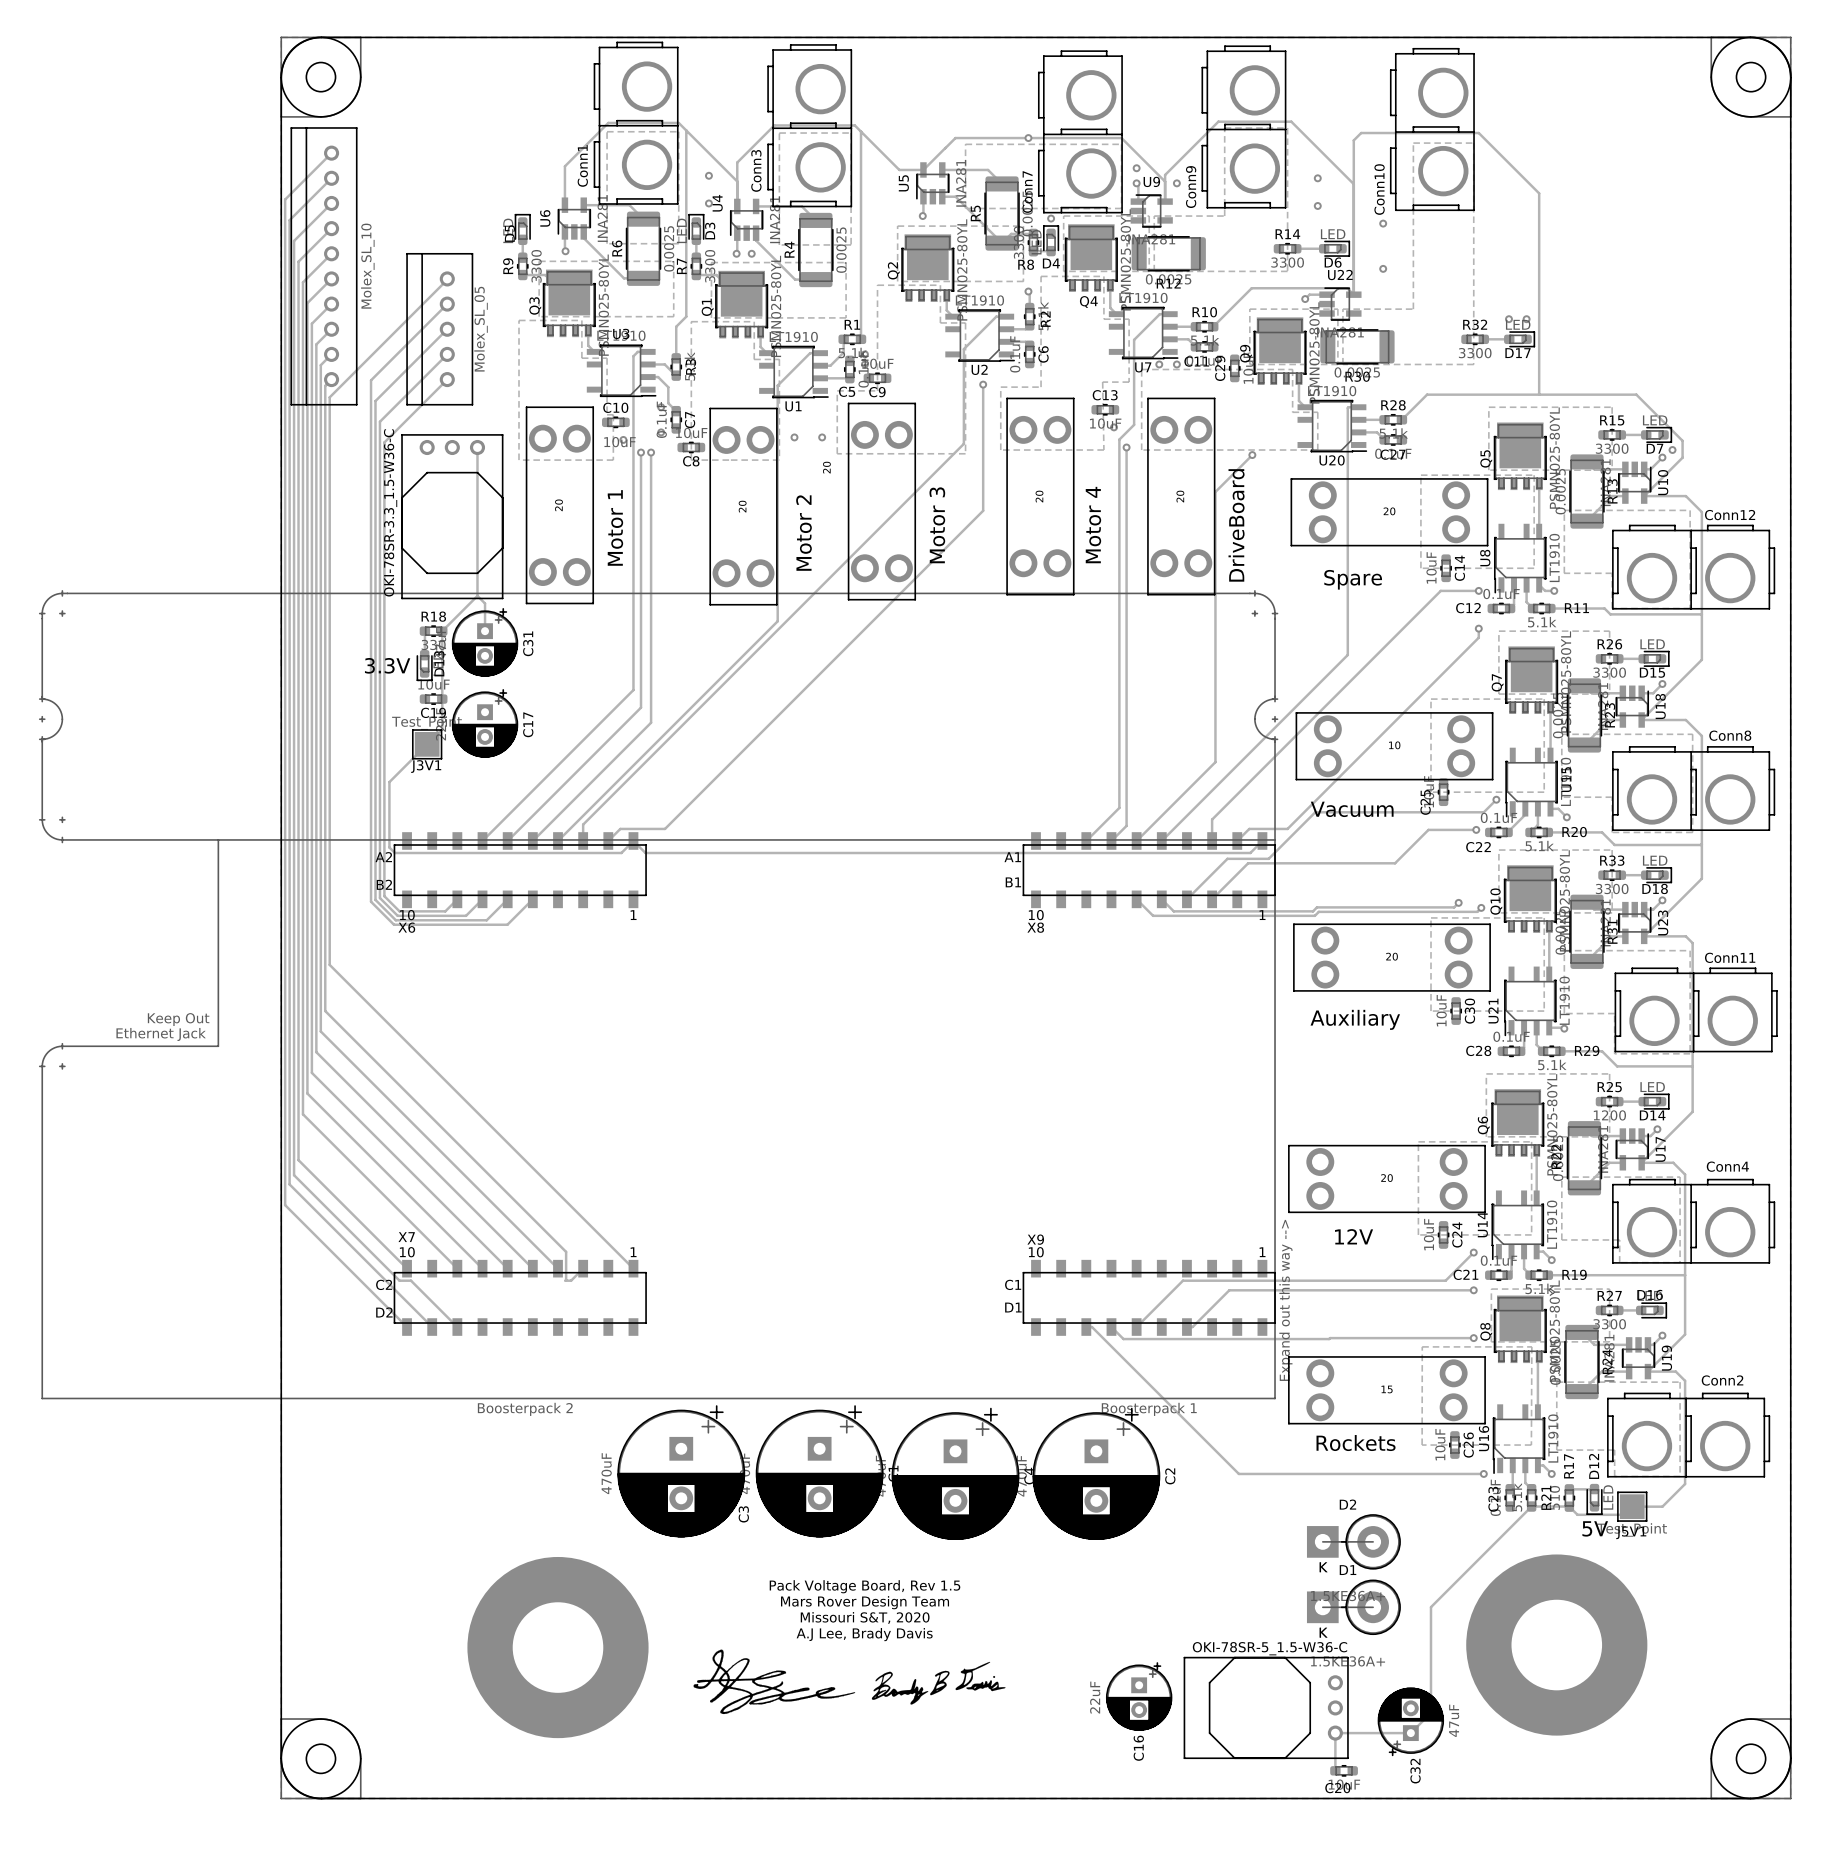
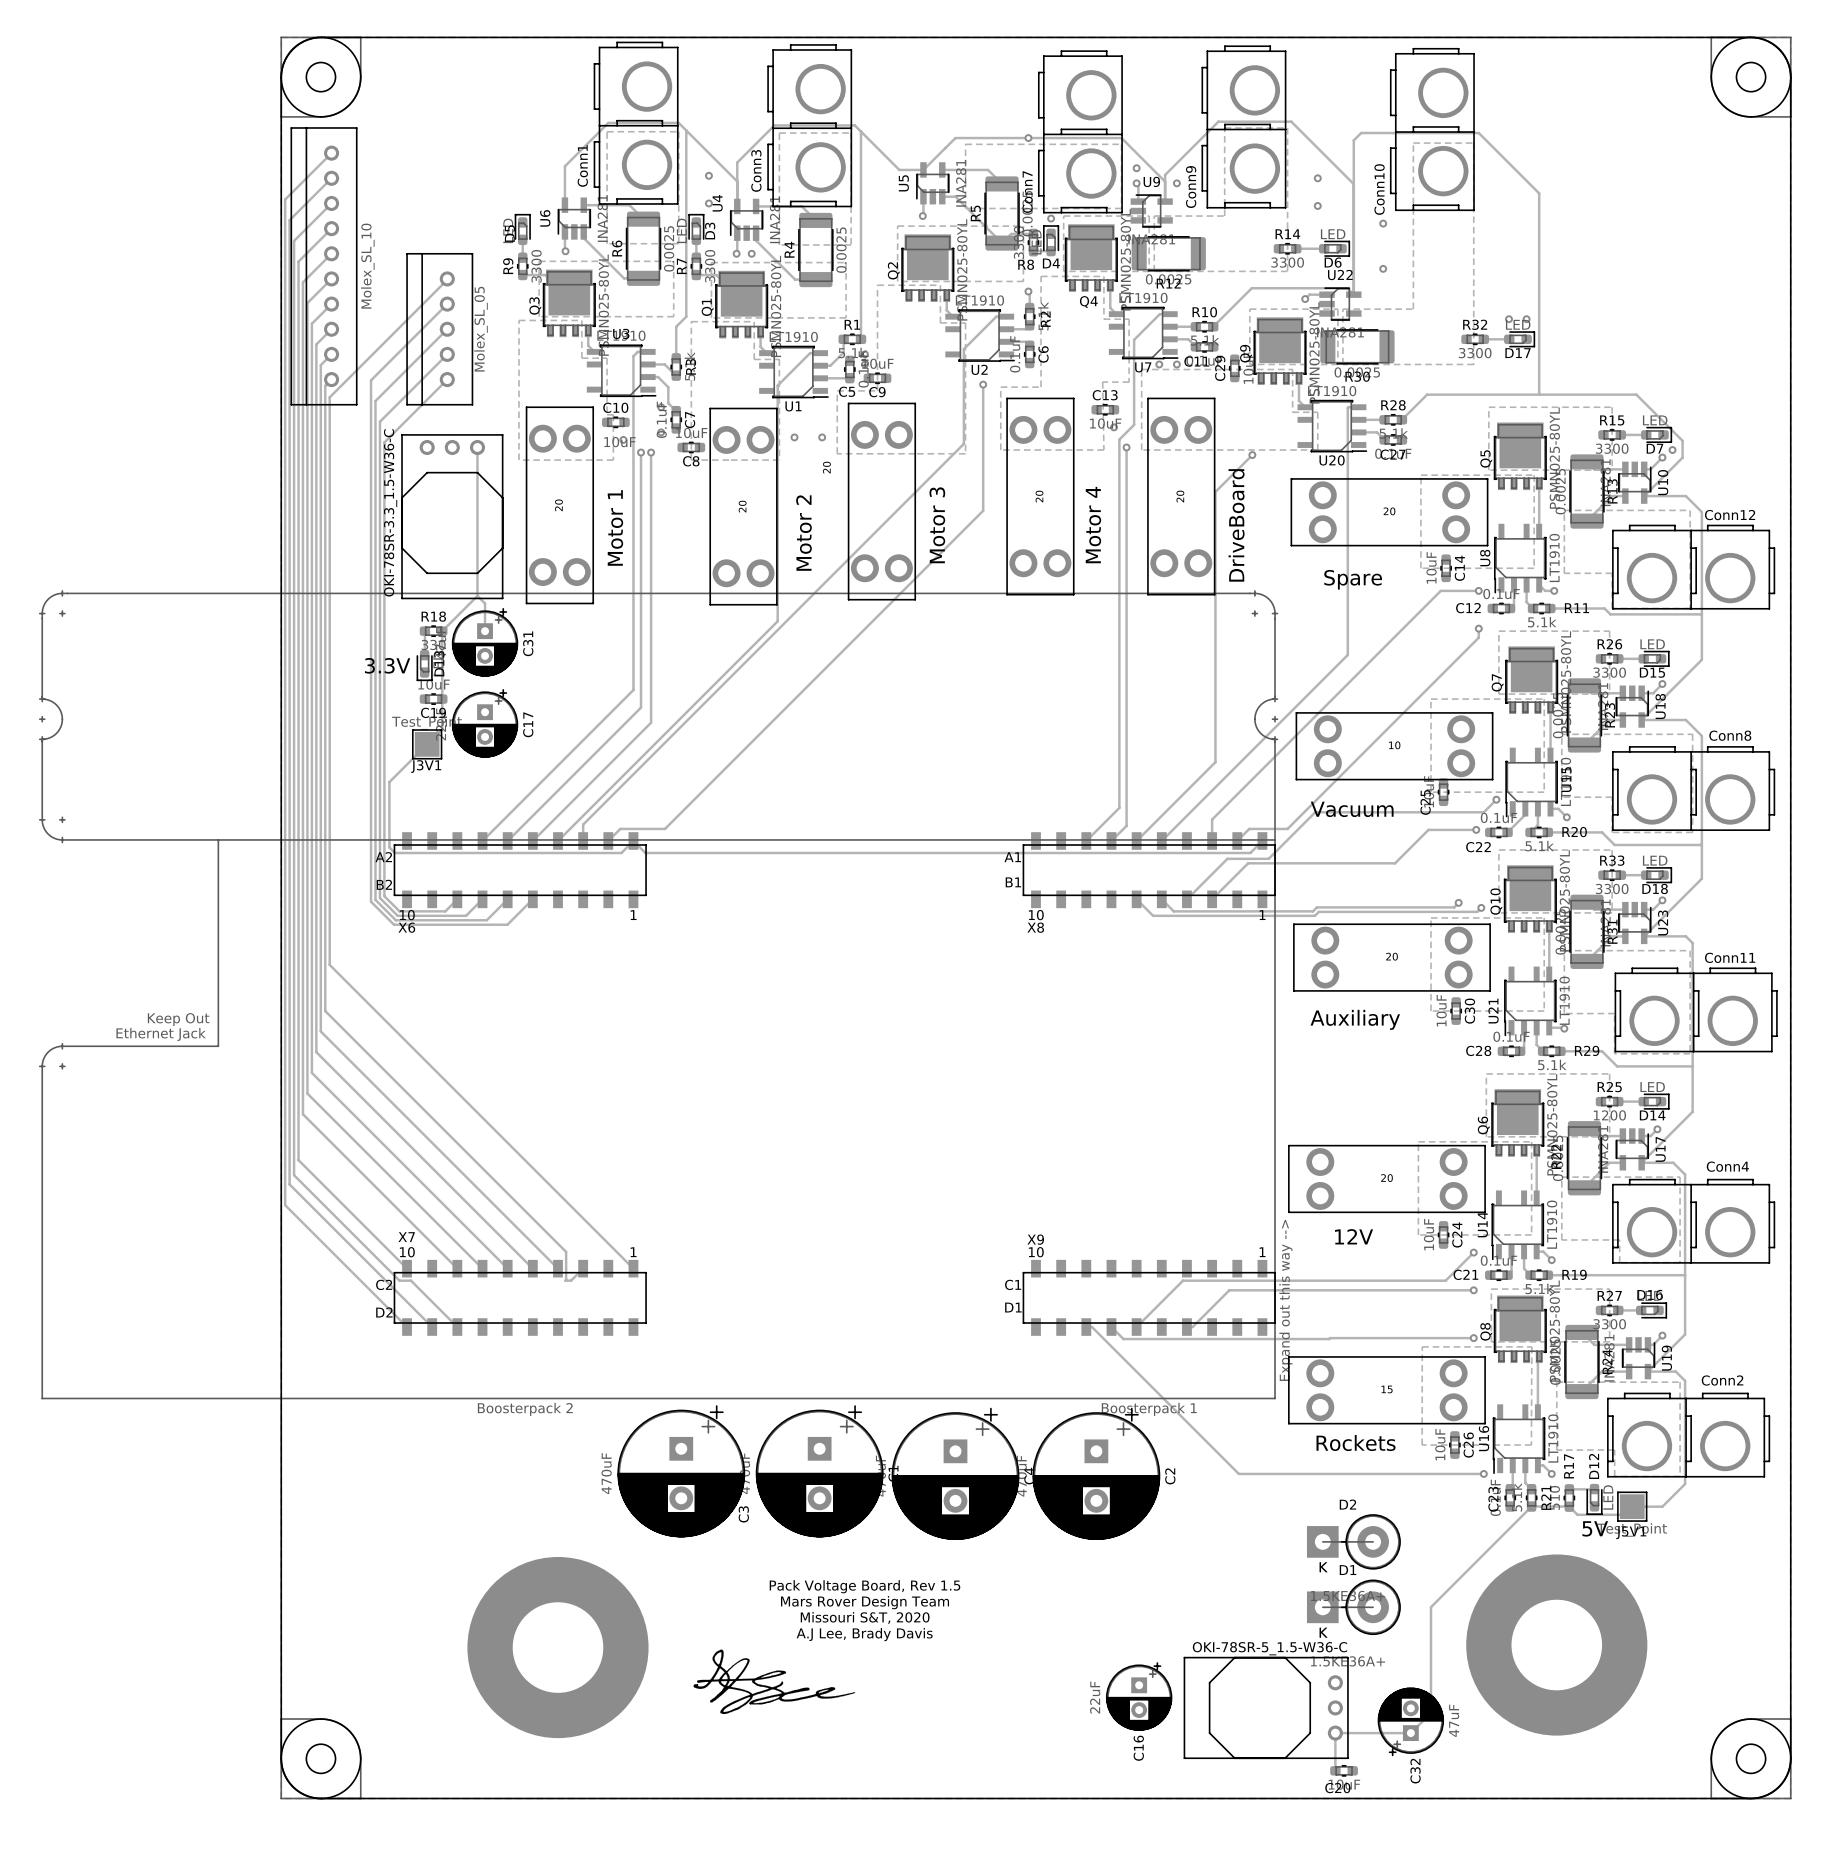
drawing: [871, 1661, 1006, 1705] -> none

